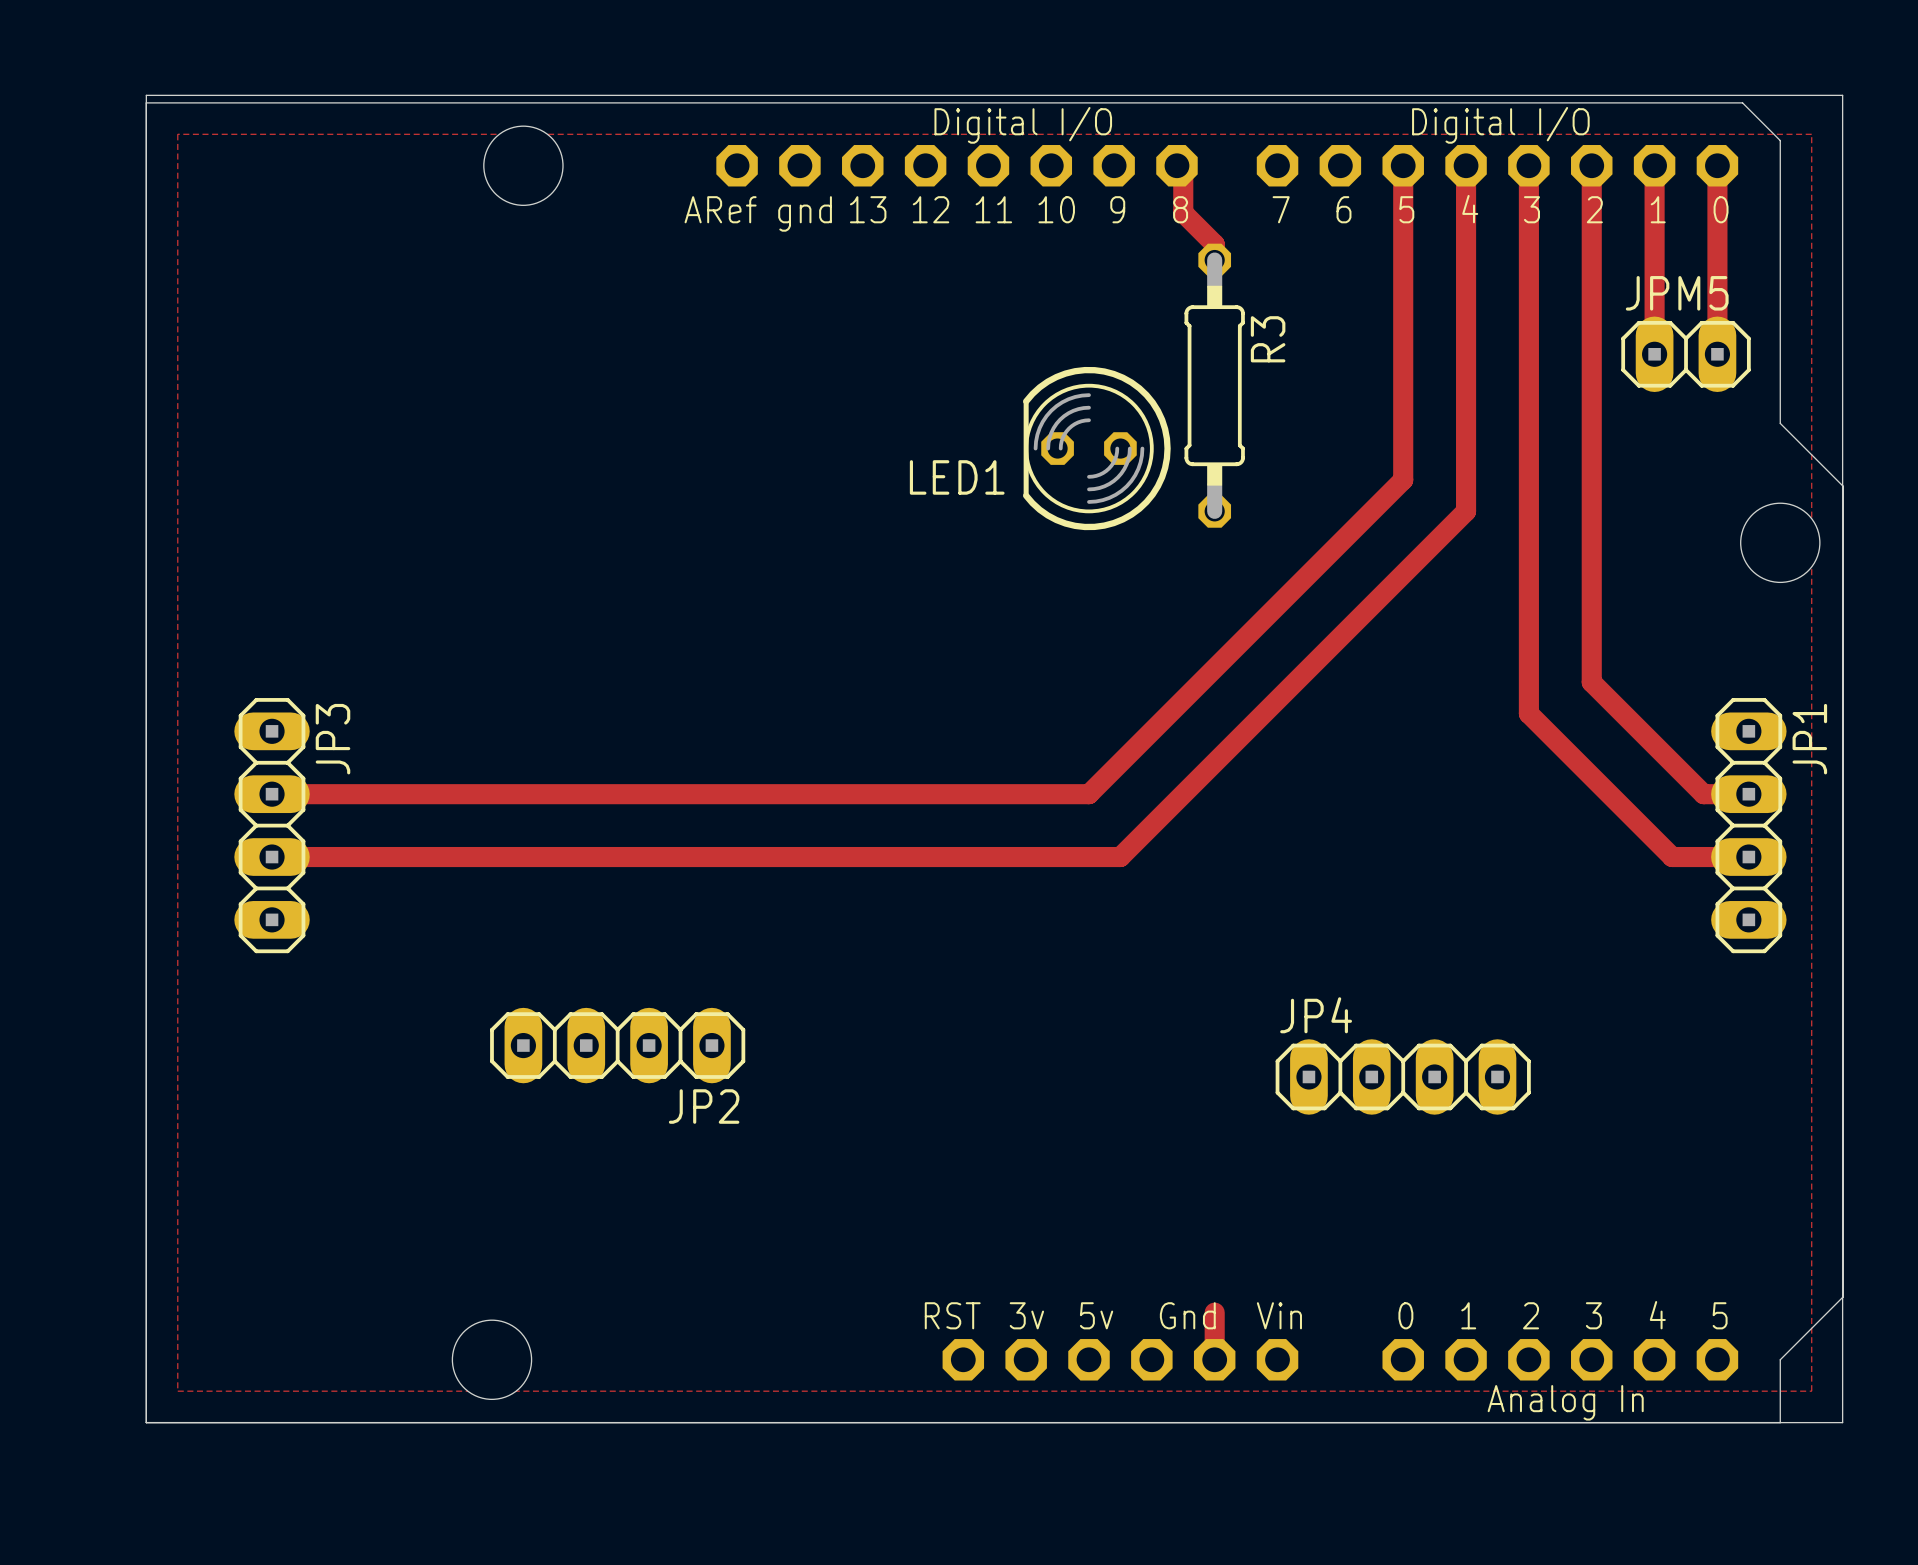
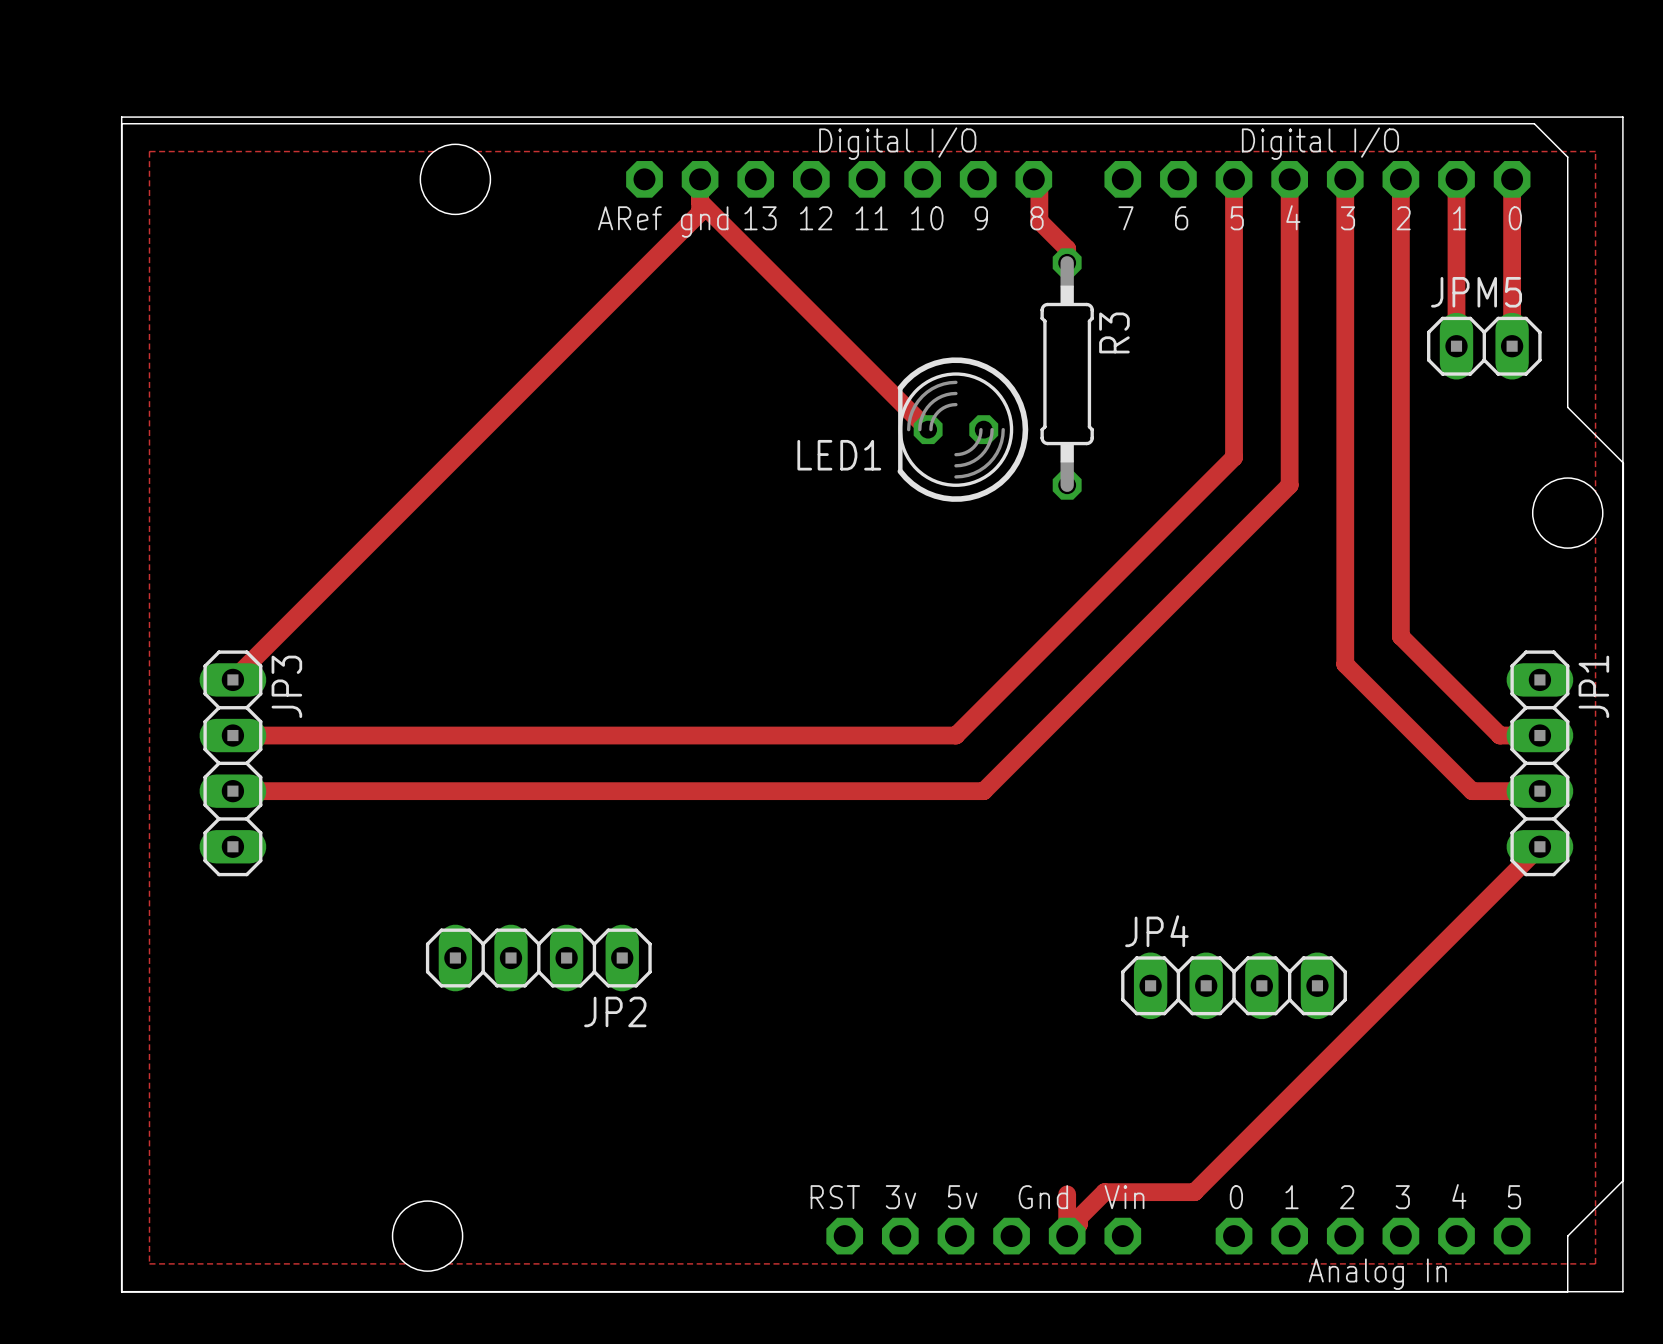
track: none -> (700, 179) (700, 212) (232, 679)
track: none -> (700, 201) (928, 429)
track: none -> (1539, 846) (1194, 1192) (1104, 1192) (1078, 1217) (1078, 1224) (1067, 1236)

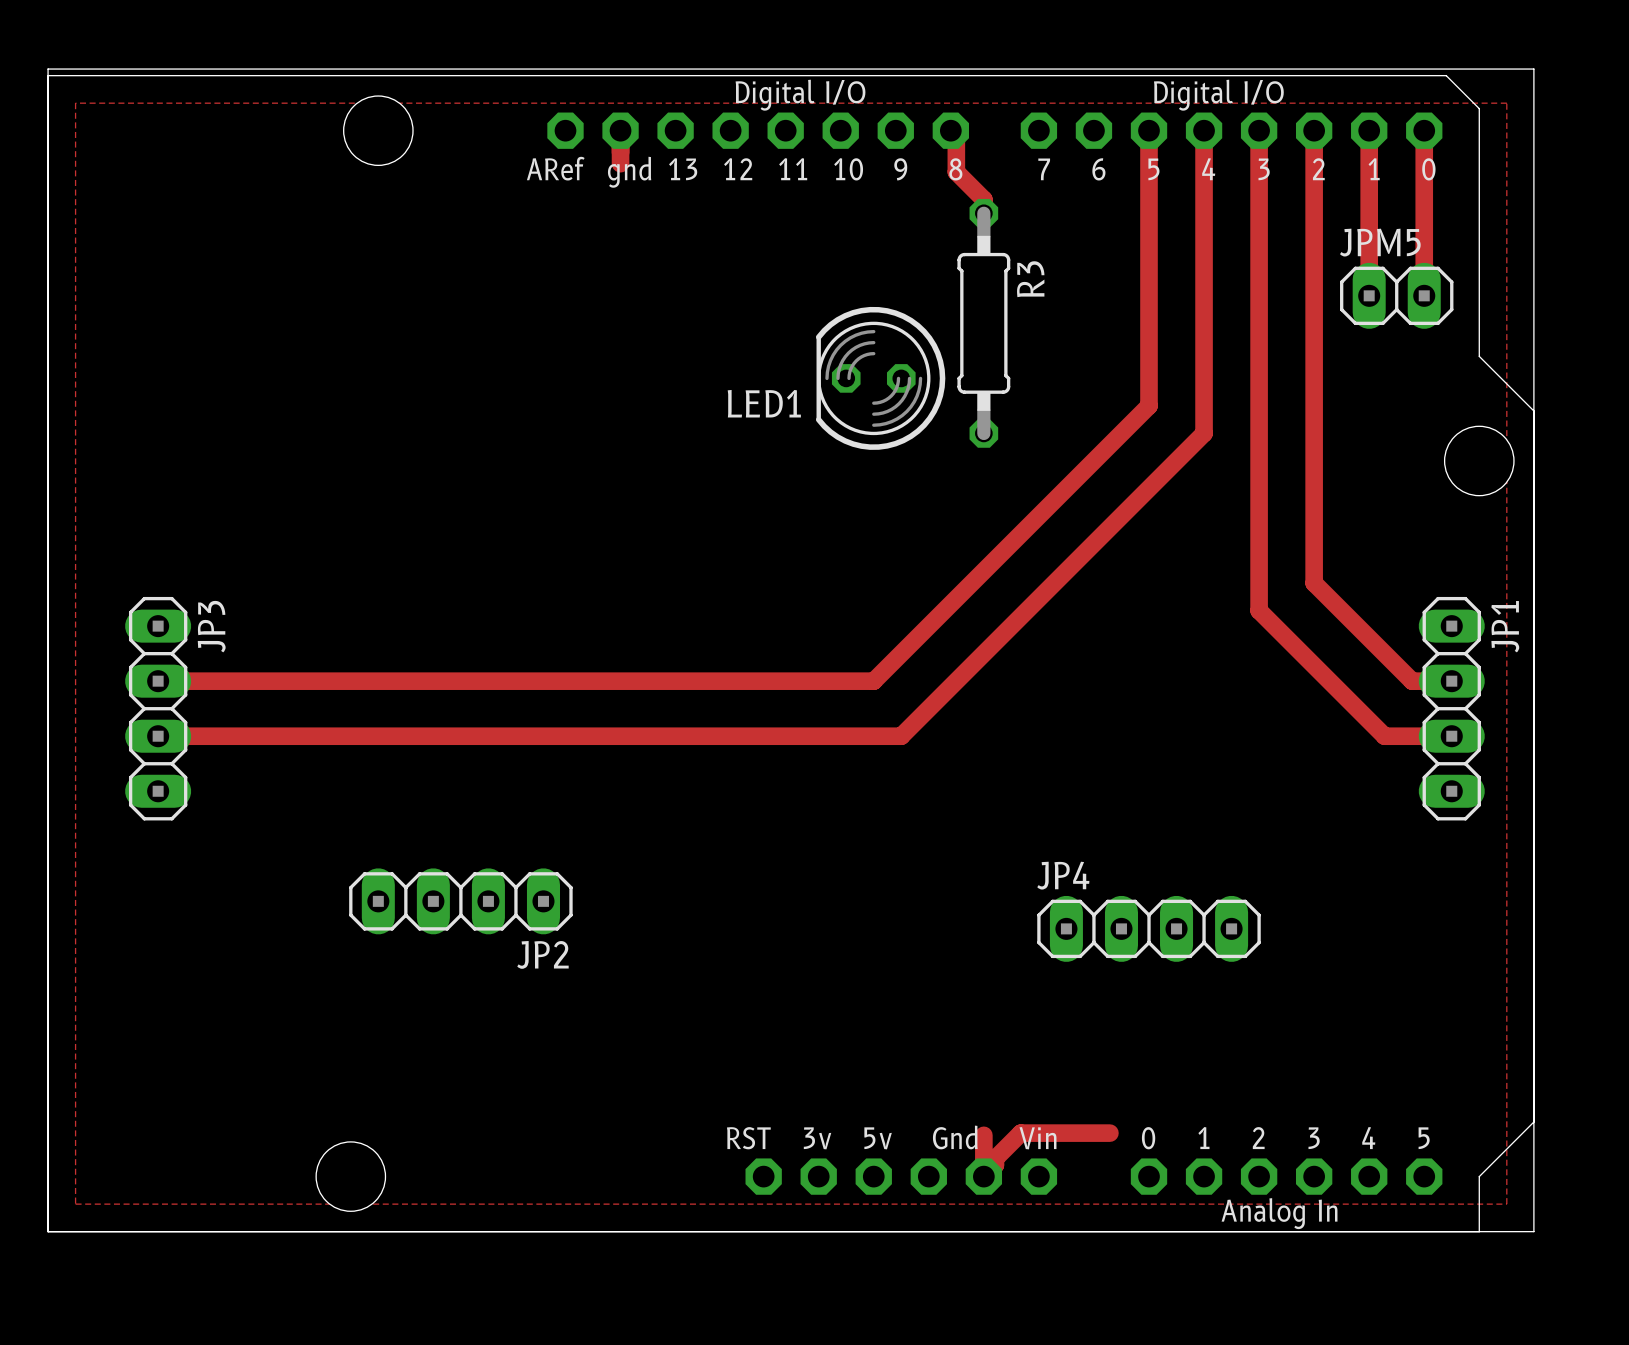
track: (700, 201) (928, 429) -> none
track: (700, 212) (232, 679) -> none
track: (1539, 846) (1194, 1192) -> none

